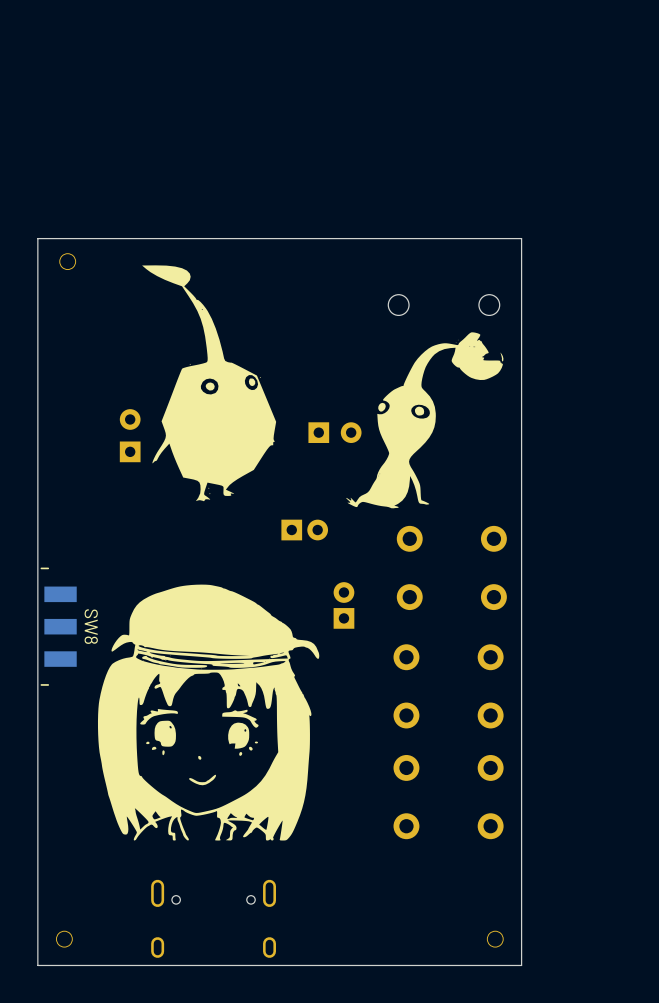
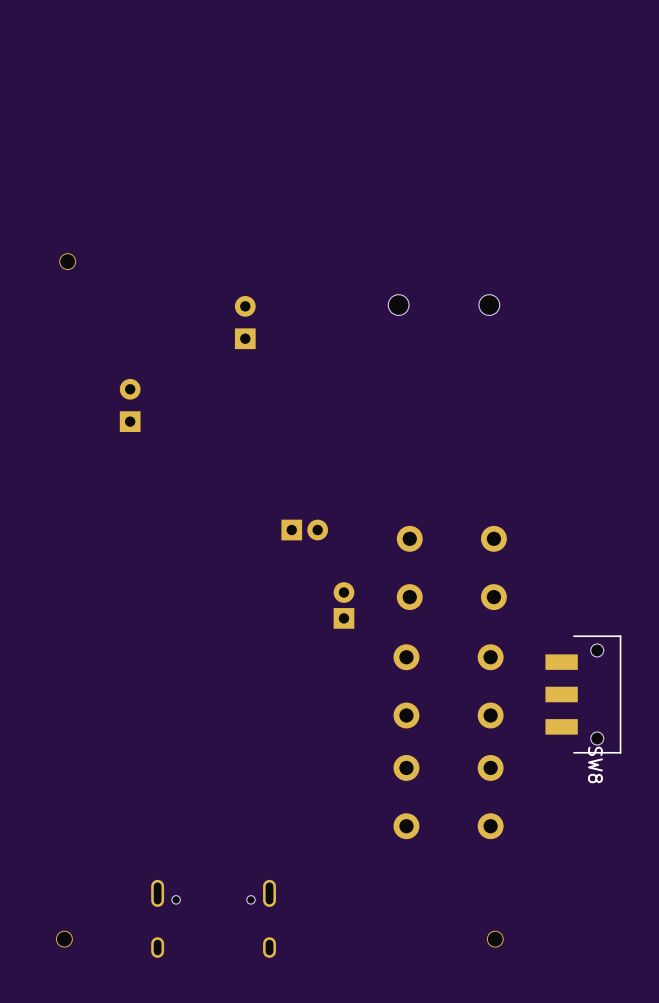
board edge: (521, 238) (37, 238) (37, 965) (521, 965) (521, 238) -> none
drawing: [142, 265, 277, 502] -> none
part: none -> (245, 322)
drawing: [346, 332, 504, 509] -> none
part: (334, 432) -> none
part position: (130, 435) -> (130, 405)
SW8 footprint: [40, 567, 77, 686] -> [545, 635, 622, 754]
drawing: [97, 584, 320, 841] -> none
SW8 name position: SW8 (91, 626) -> SW8 (595, 764)

